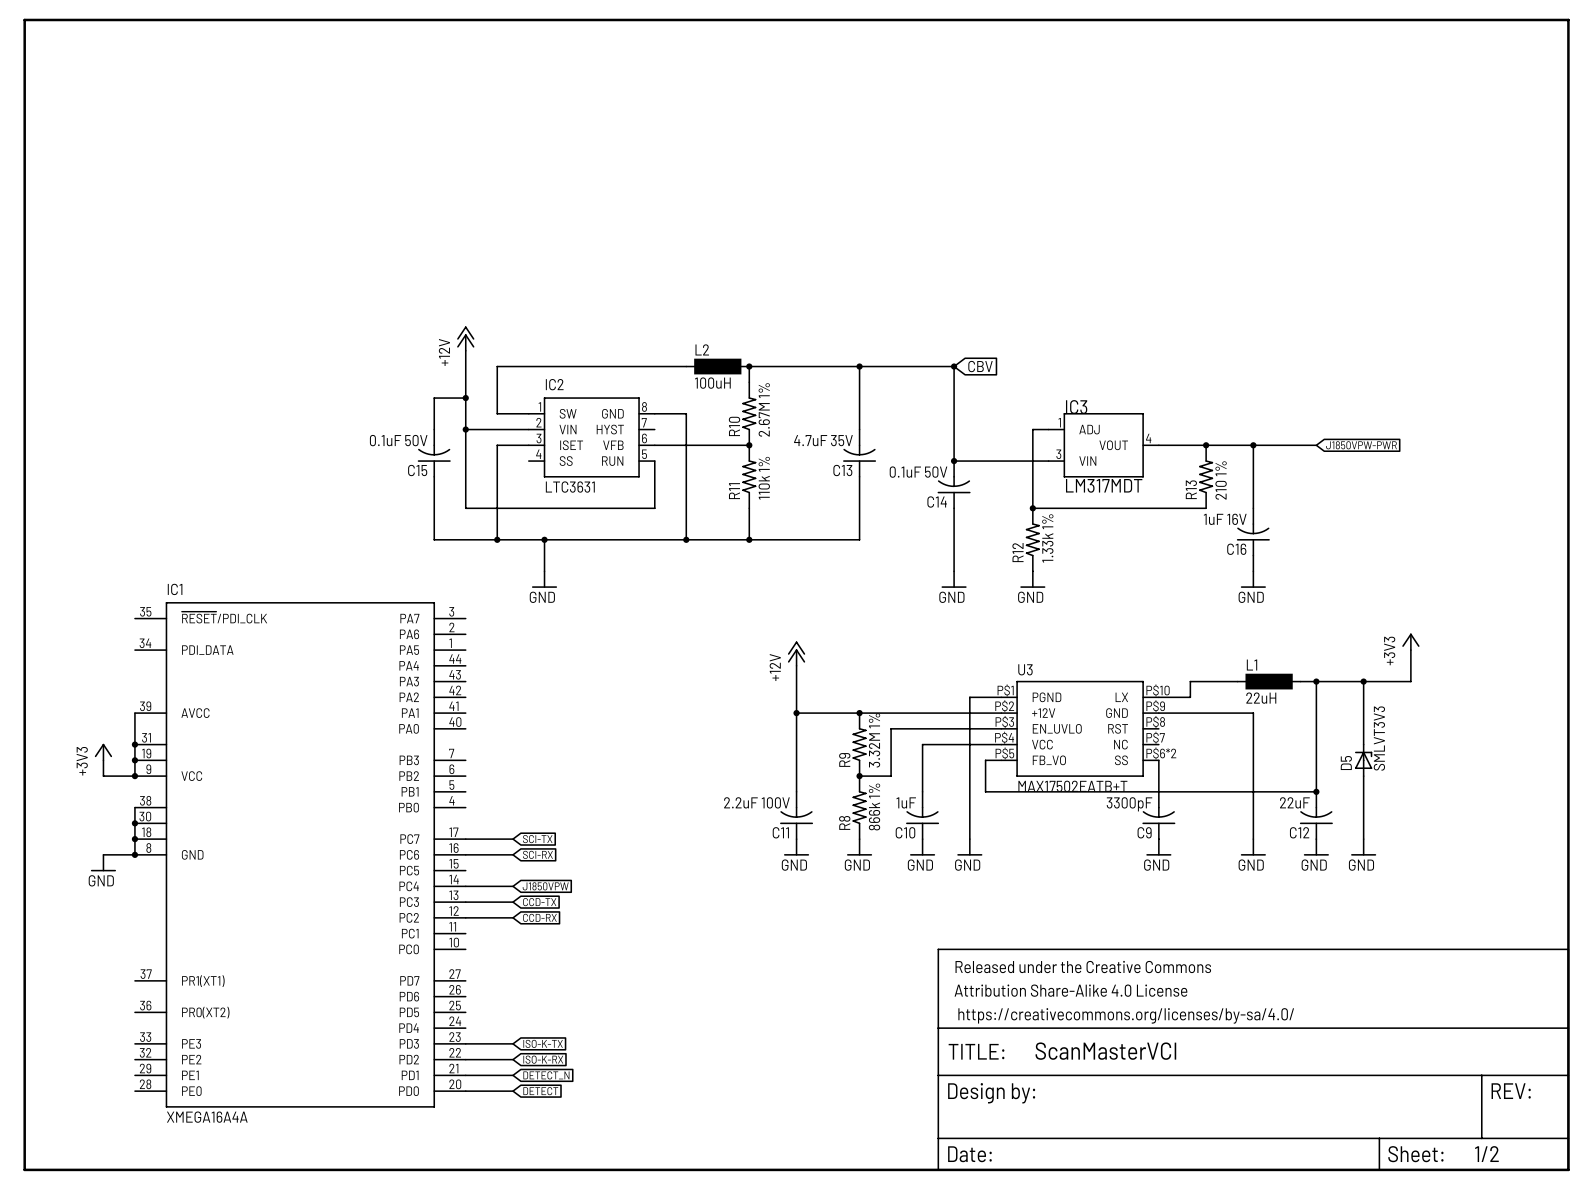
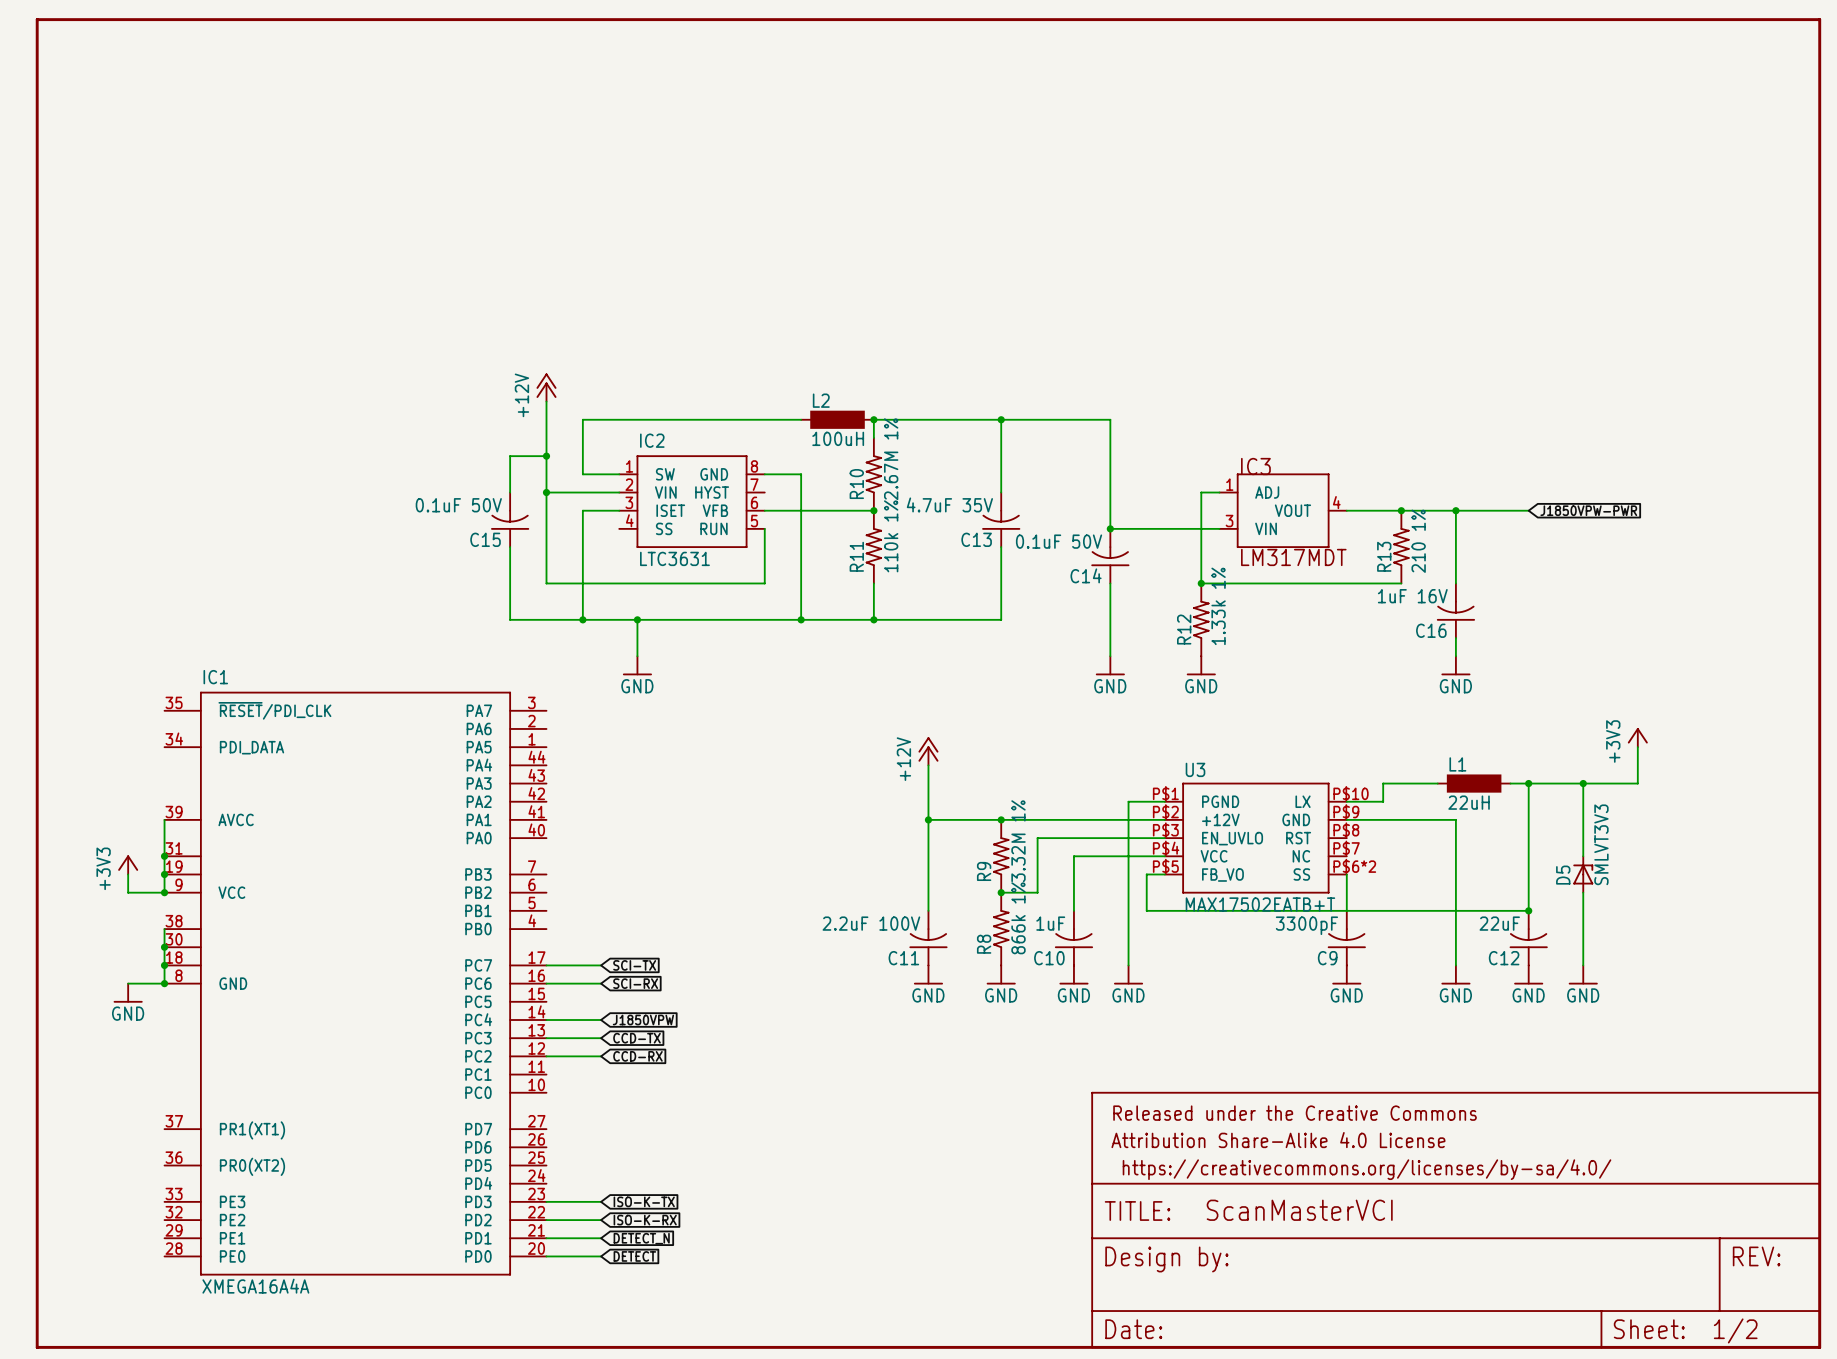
junction: (954, 366) -> none
global label: CBV (980, 366) -> none

